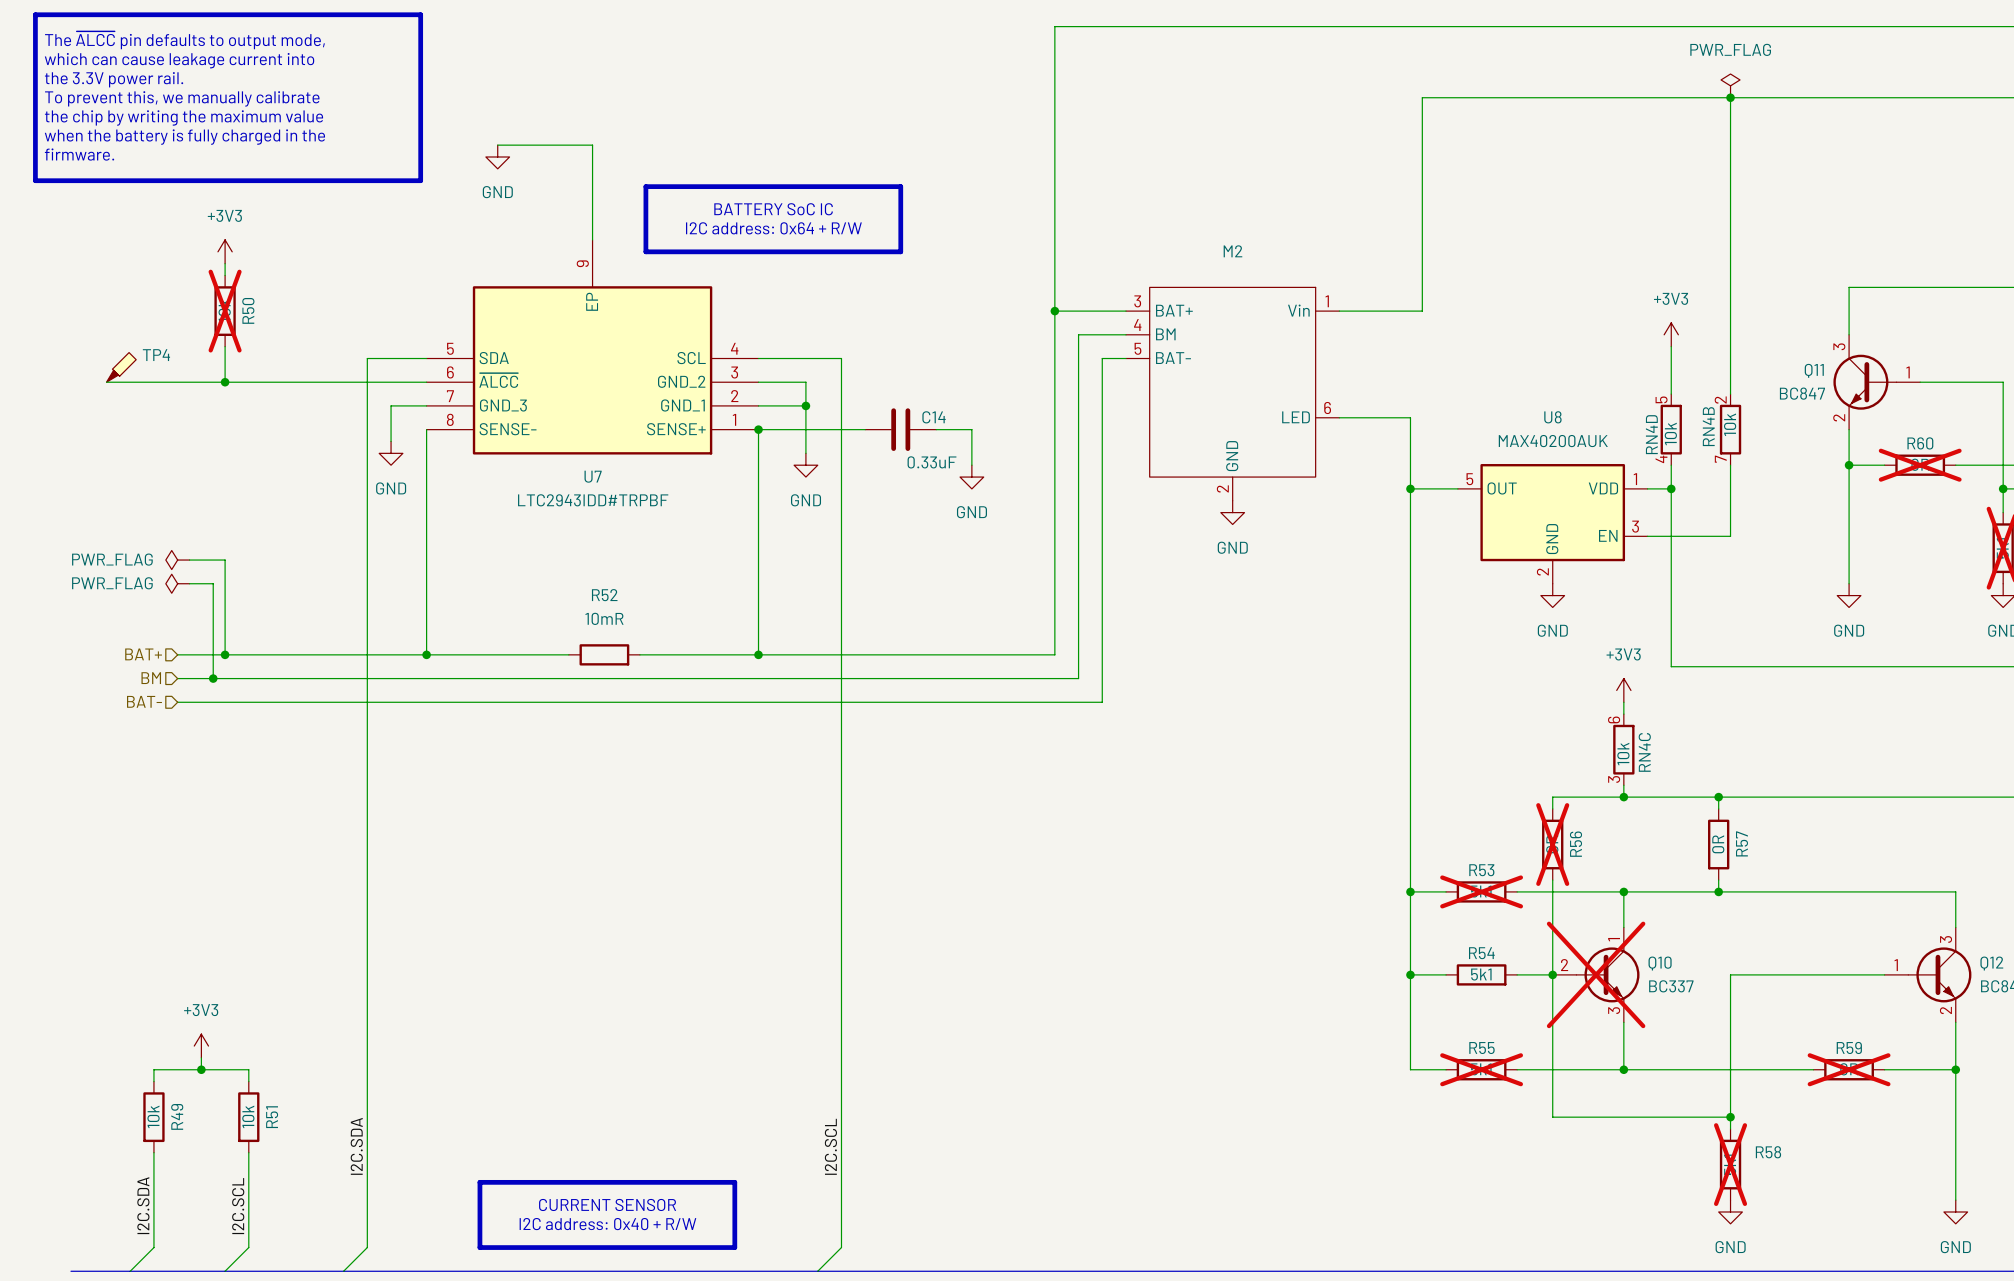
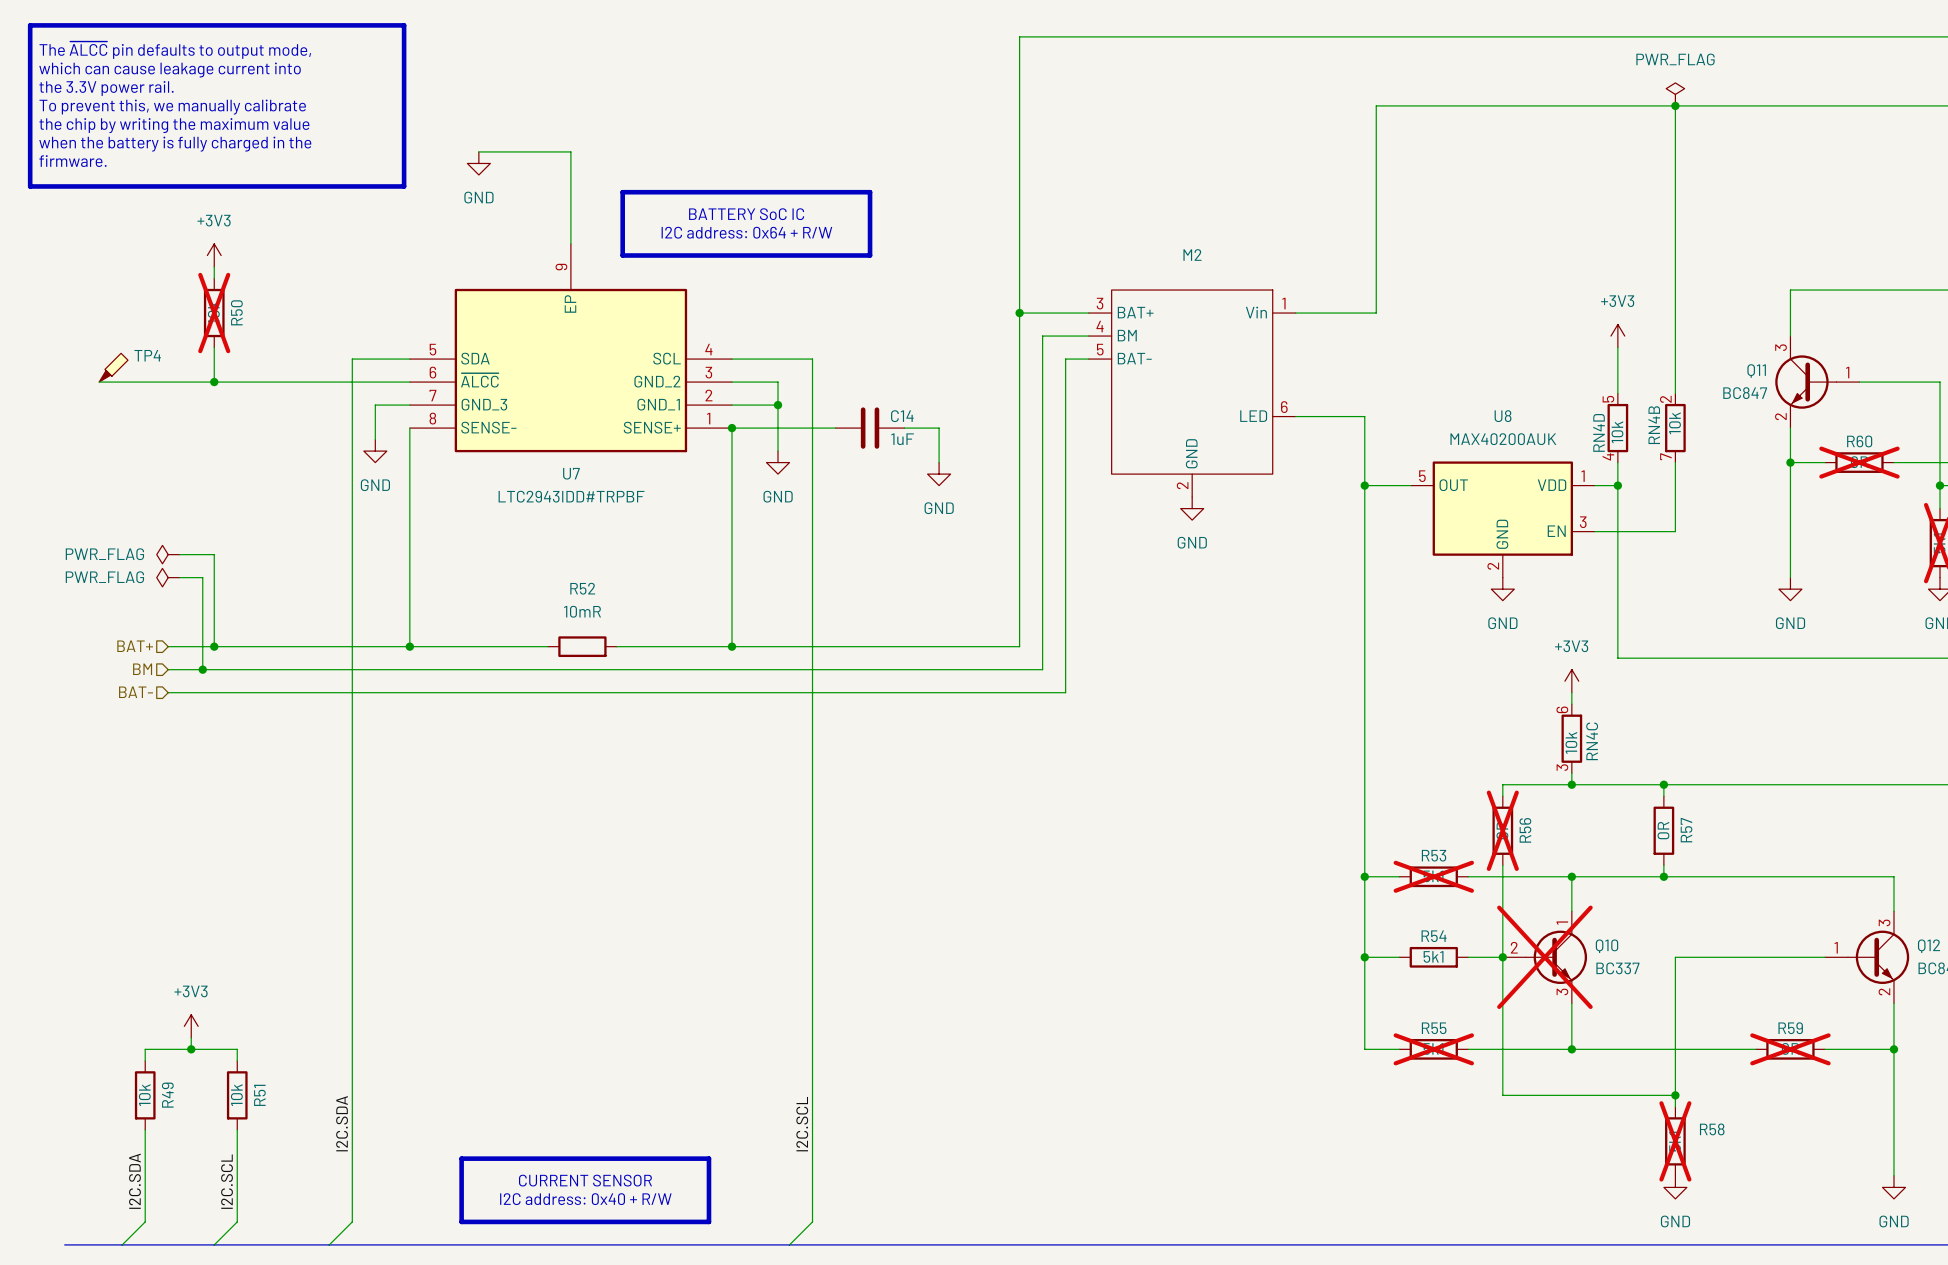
C14 value: 0.33uF (931, 462) -> 1uF (902, 439)

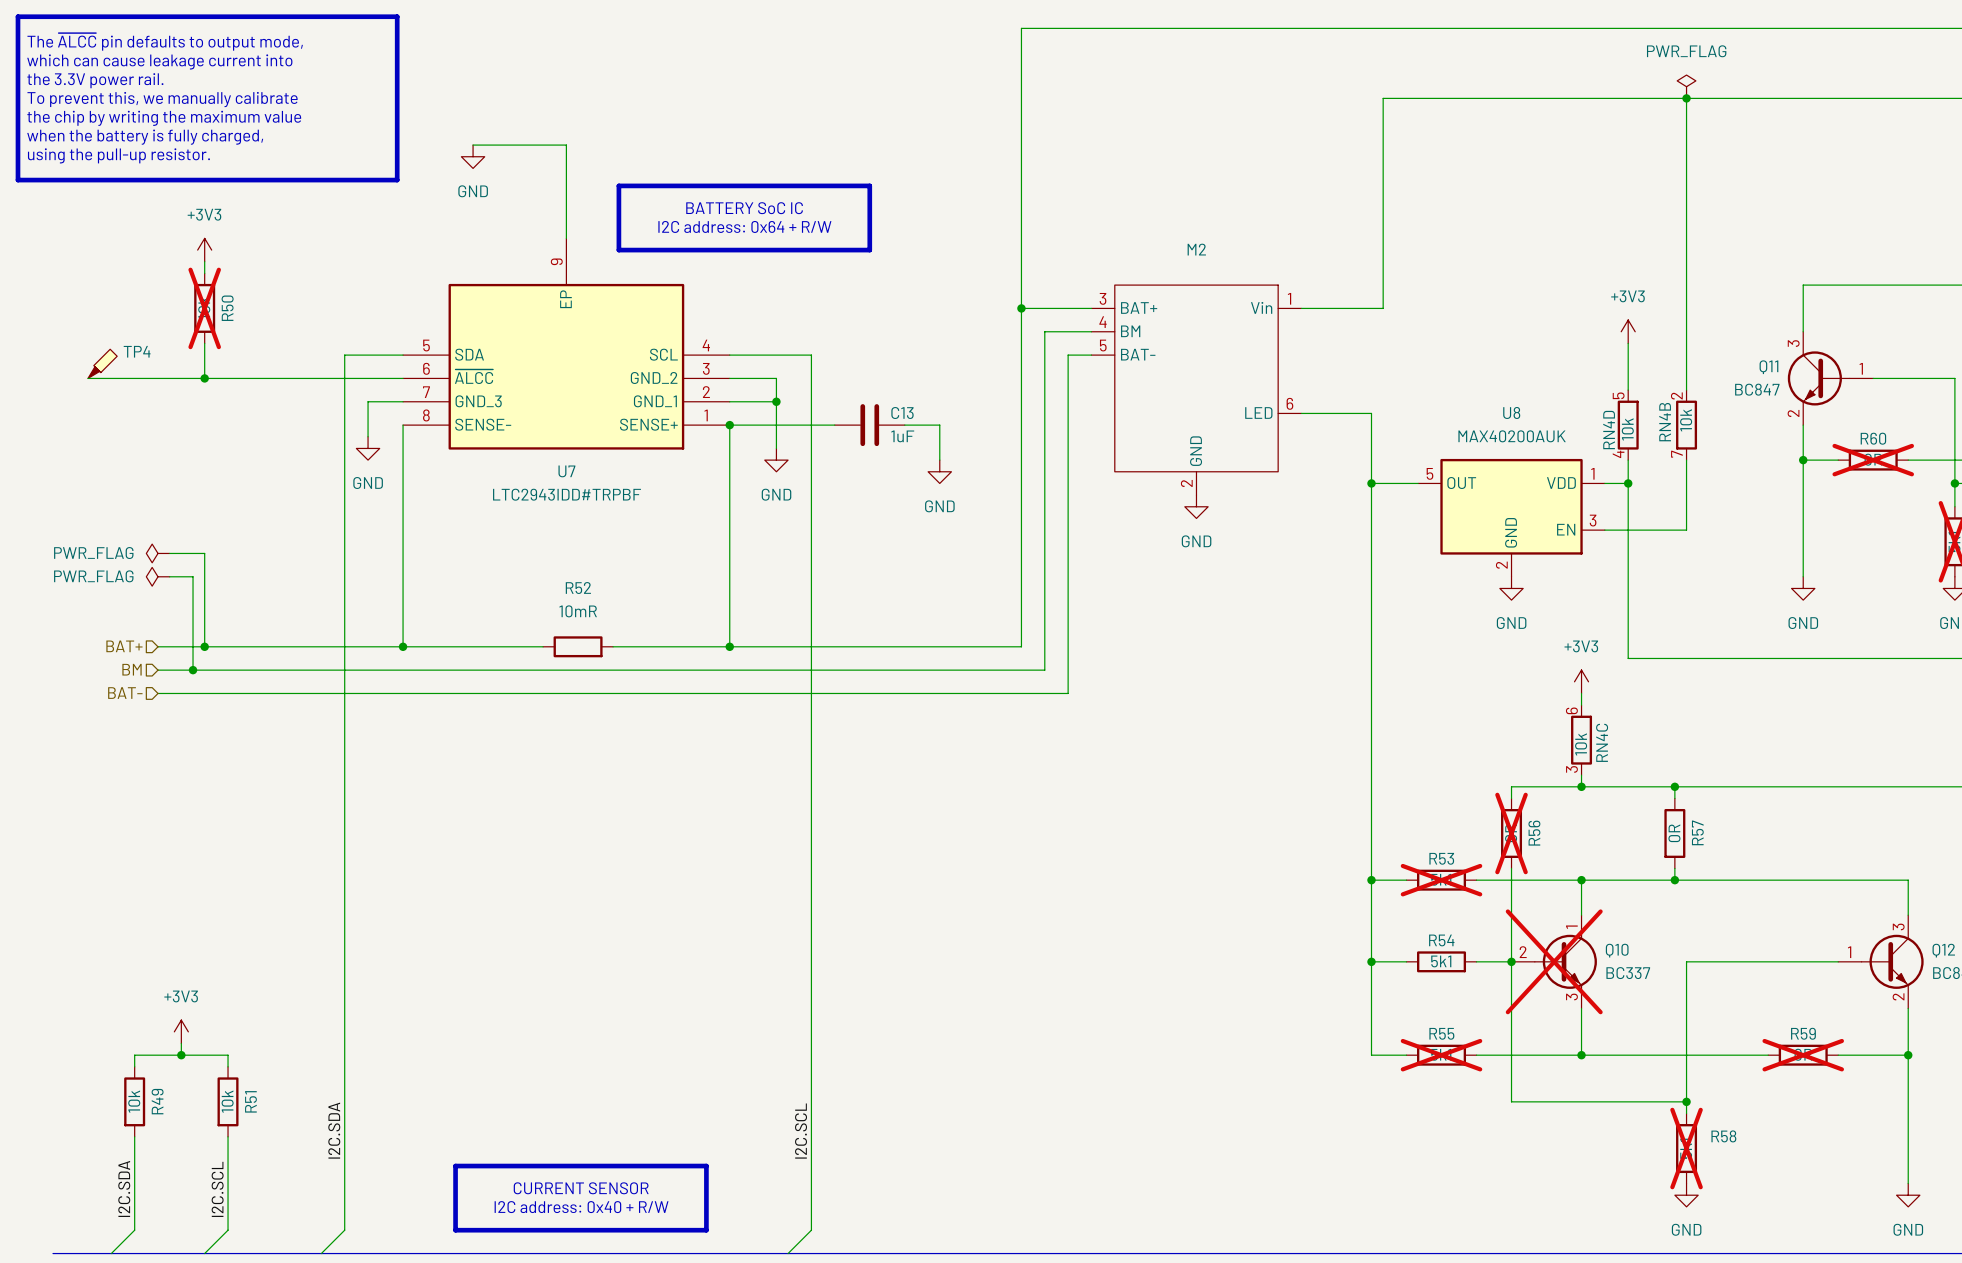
text: when the battery is fully charged in the (175, 144) -> when the battery is fully charged, (145, 137)
text: firmware. (72, 161) -> using the pull-up resistor. (118, 155)
C14 name: C14 (902, 416) -> C13 (902, 413)

